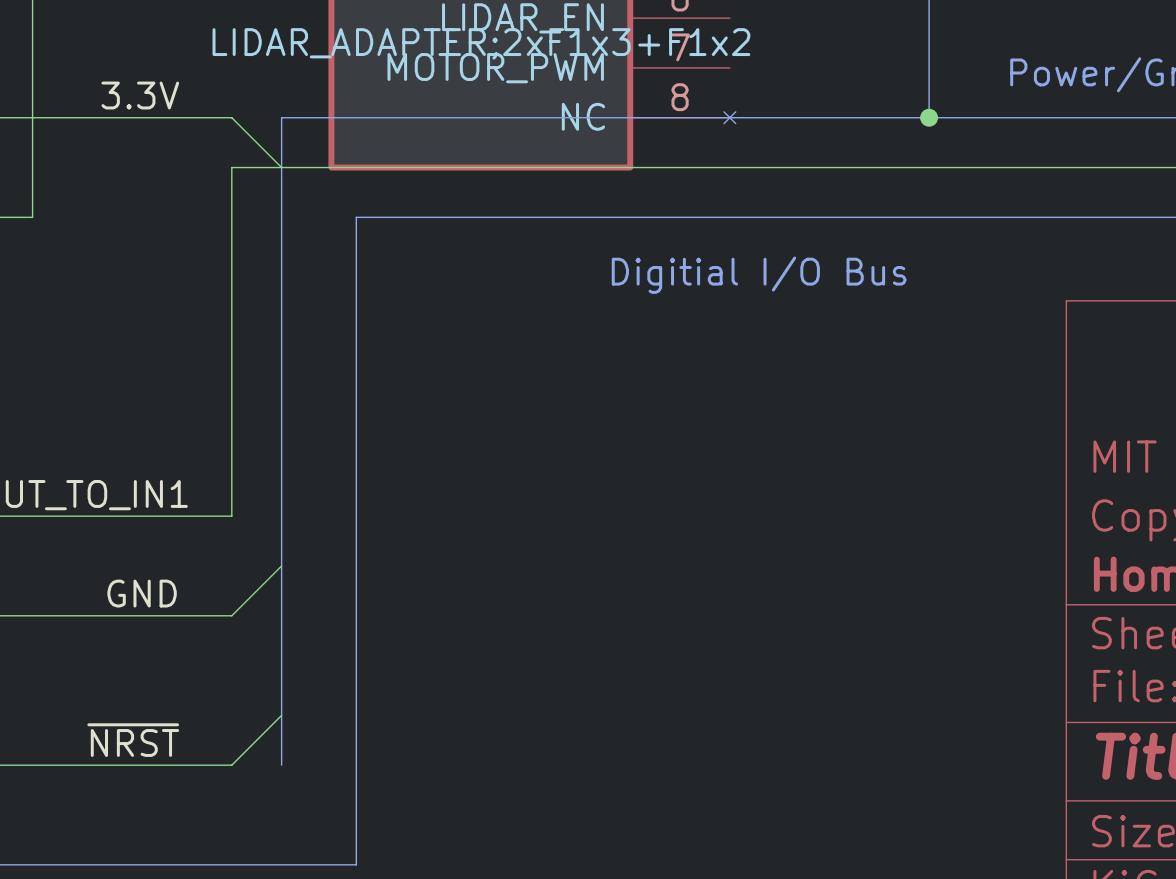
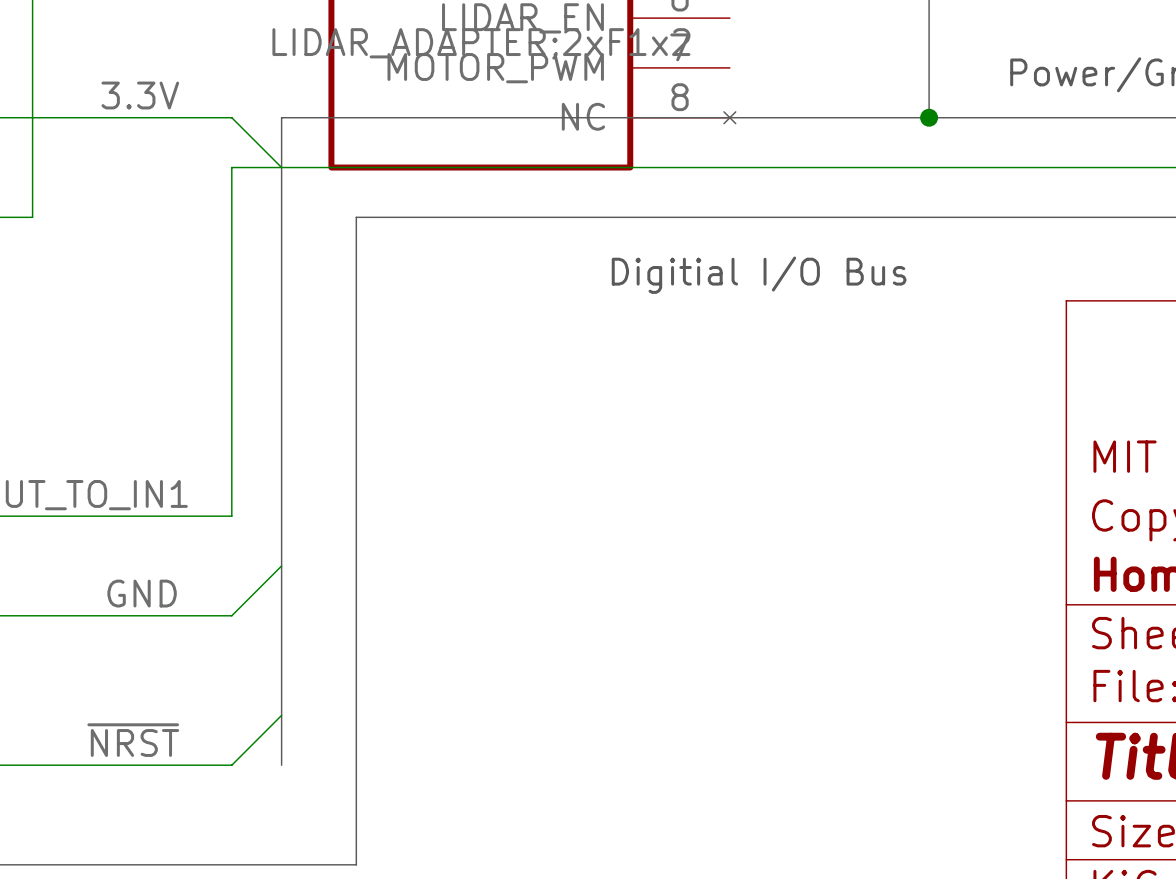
part value: LIDAR_ADAPTER;2xF1x3+F1x2 (481, 43) -> LIDAR_ADAPTER;2xF1x2 (481, 43)

